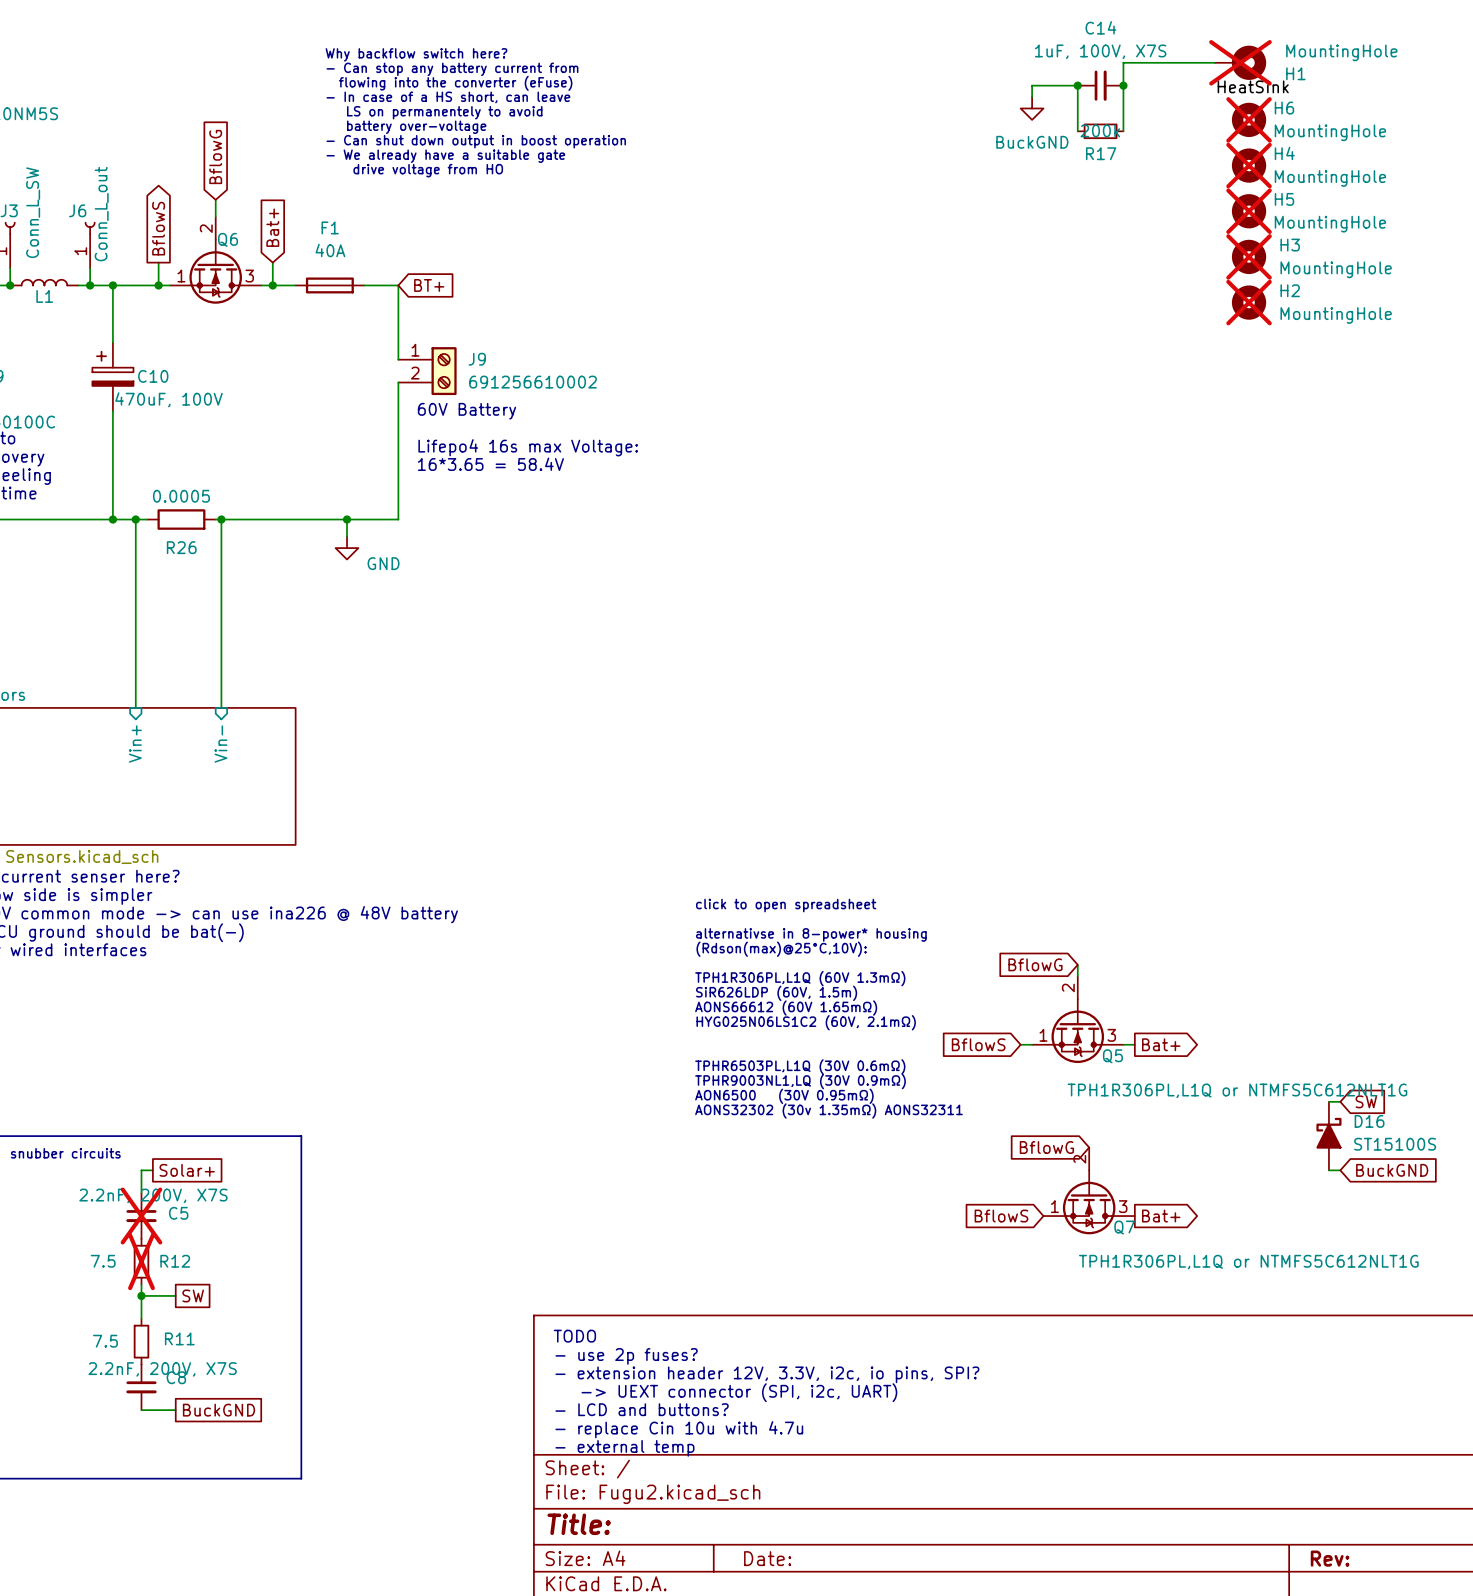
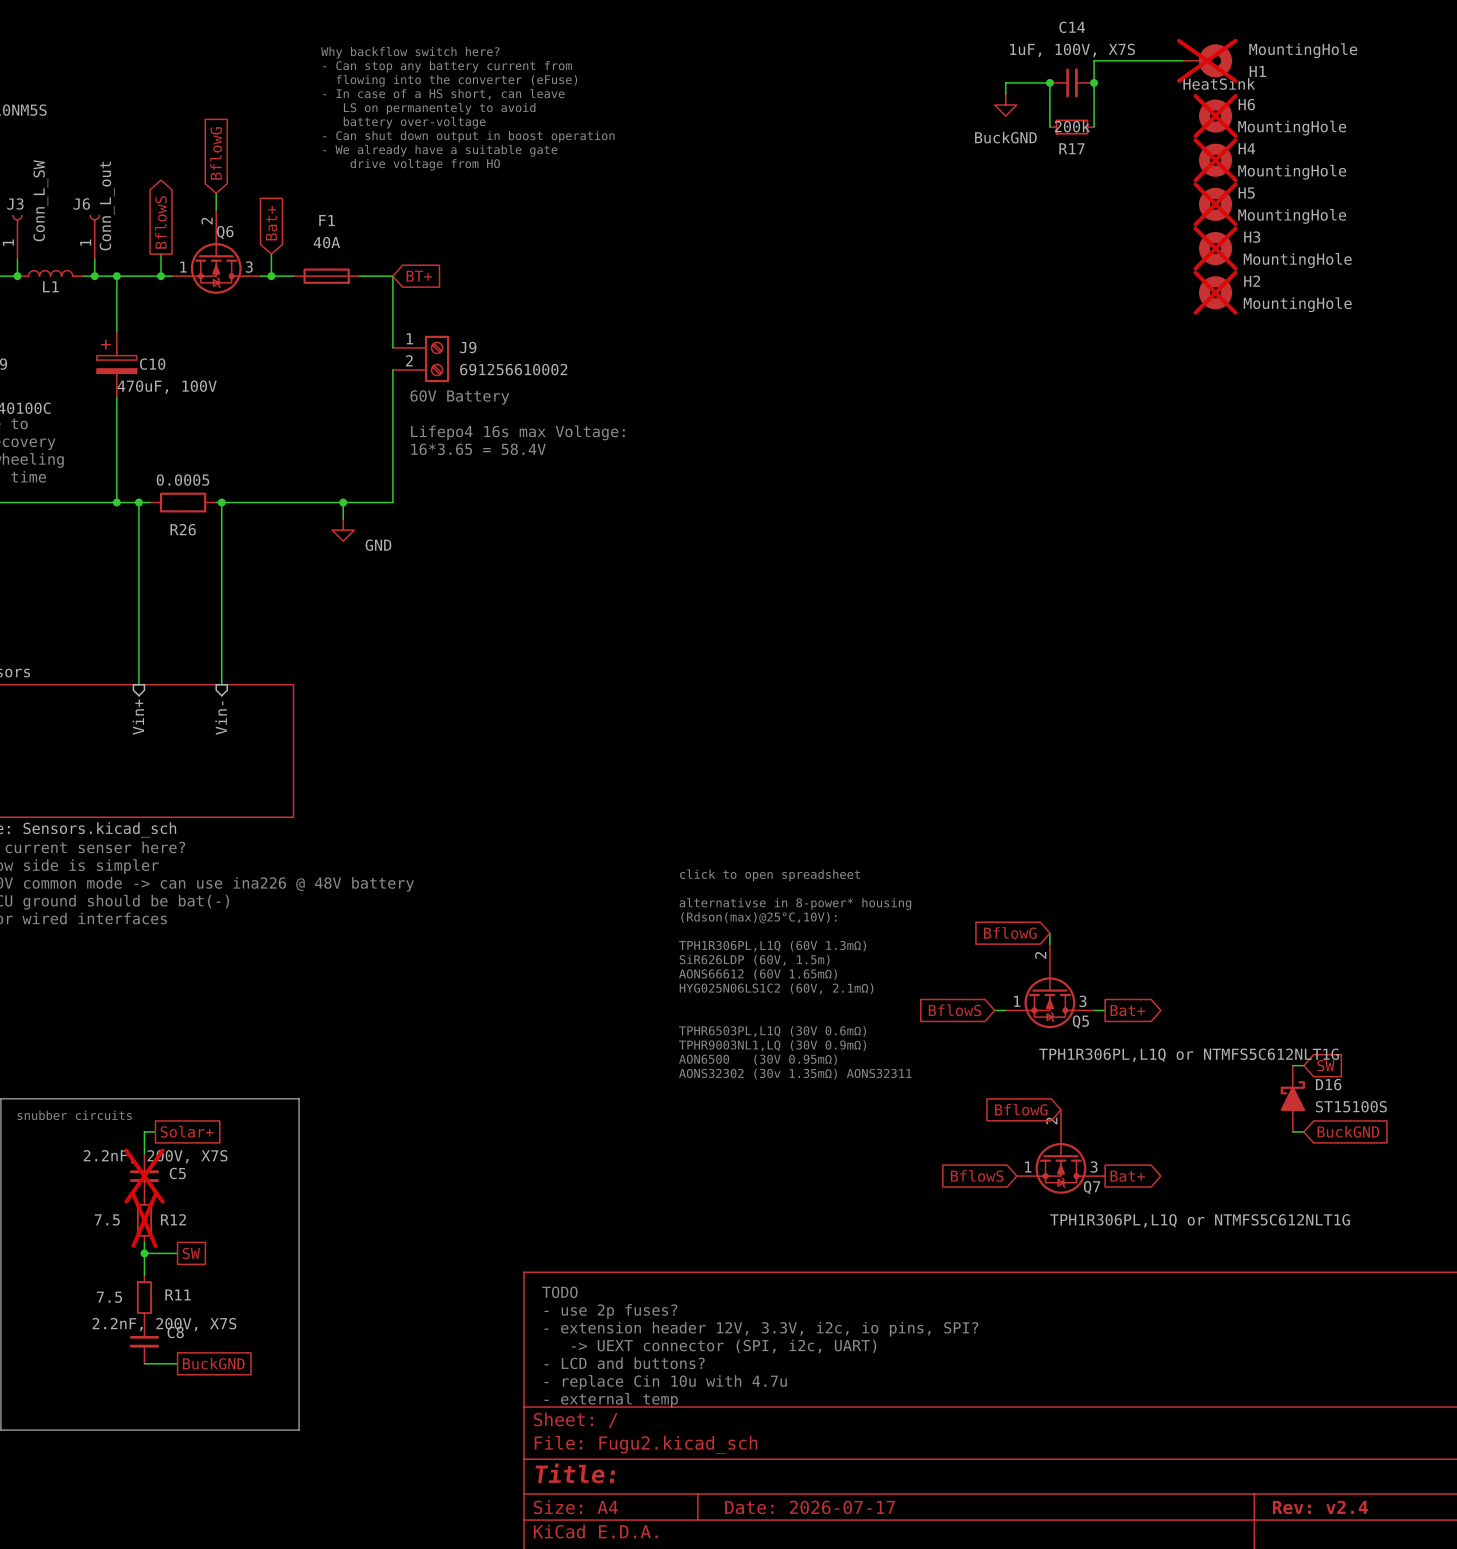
title block: Date: (767, 1558) -> Date: 2026-07-17 (810, 1507)
title block: Rev: (1330, 1558) -> Rev: v2.4 (1320, 1507)

